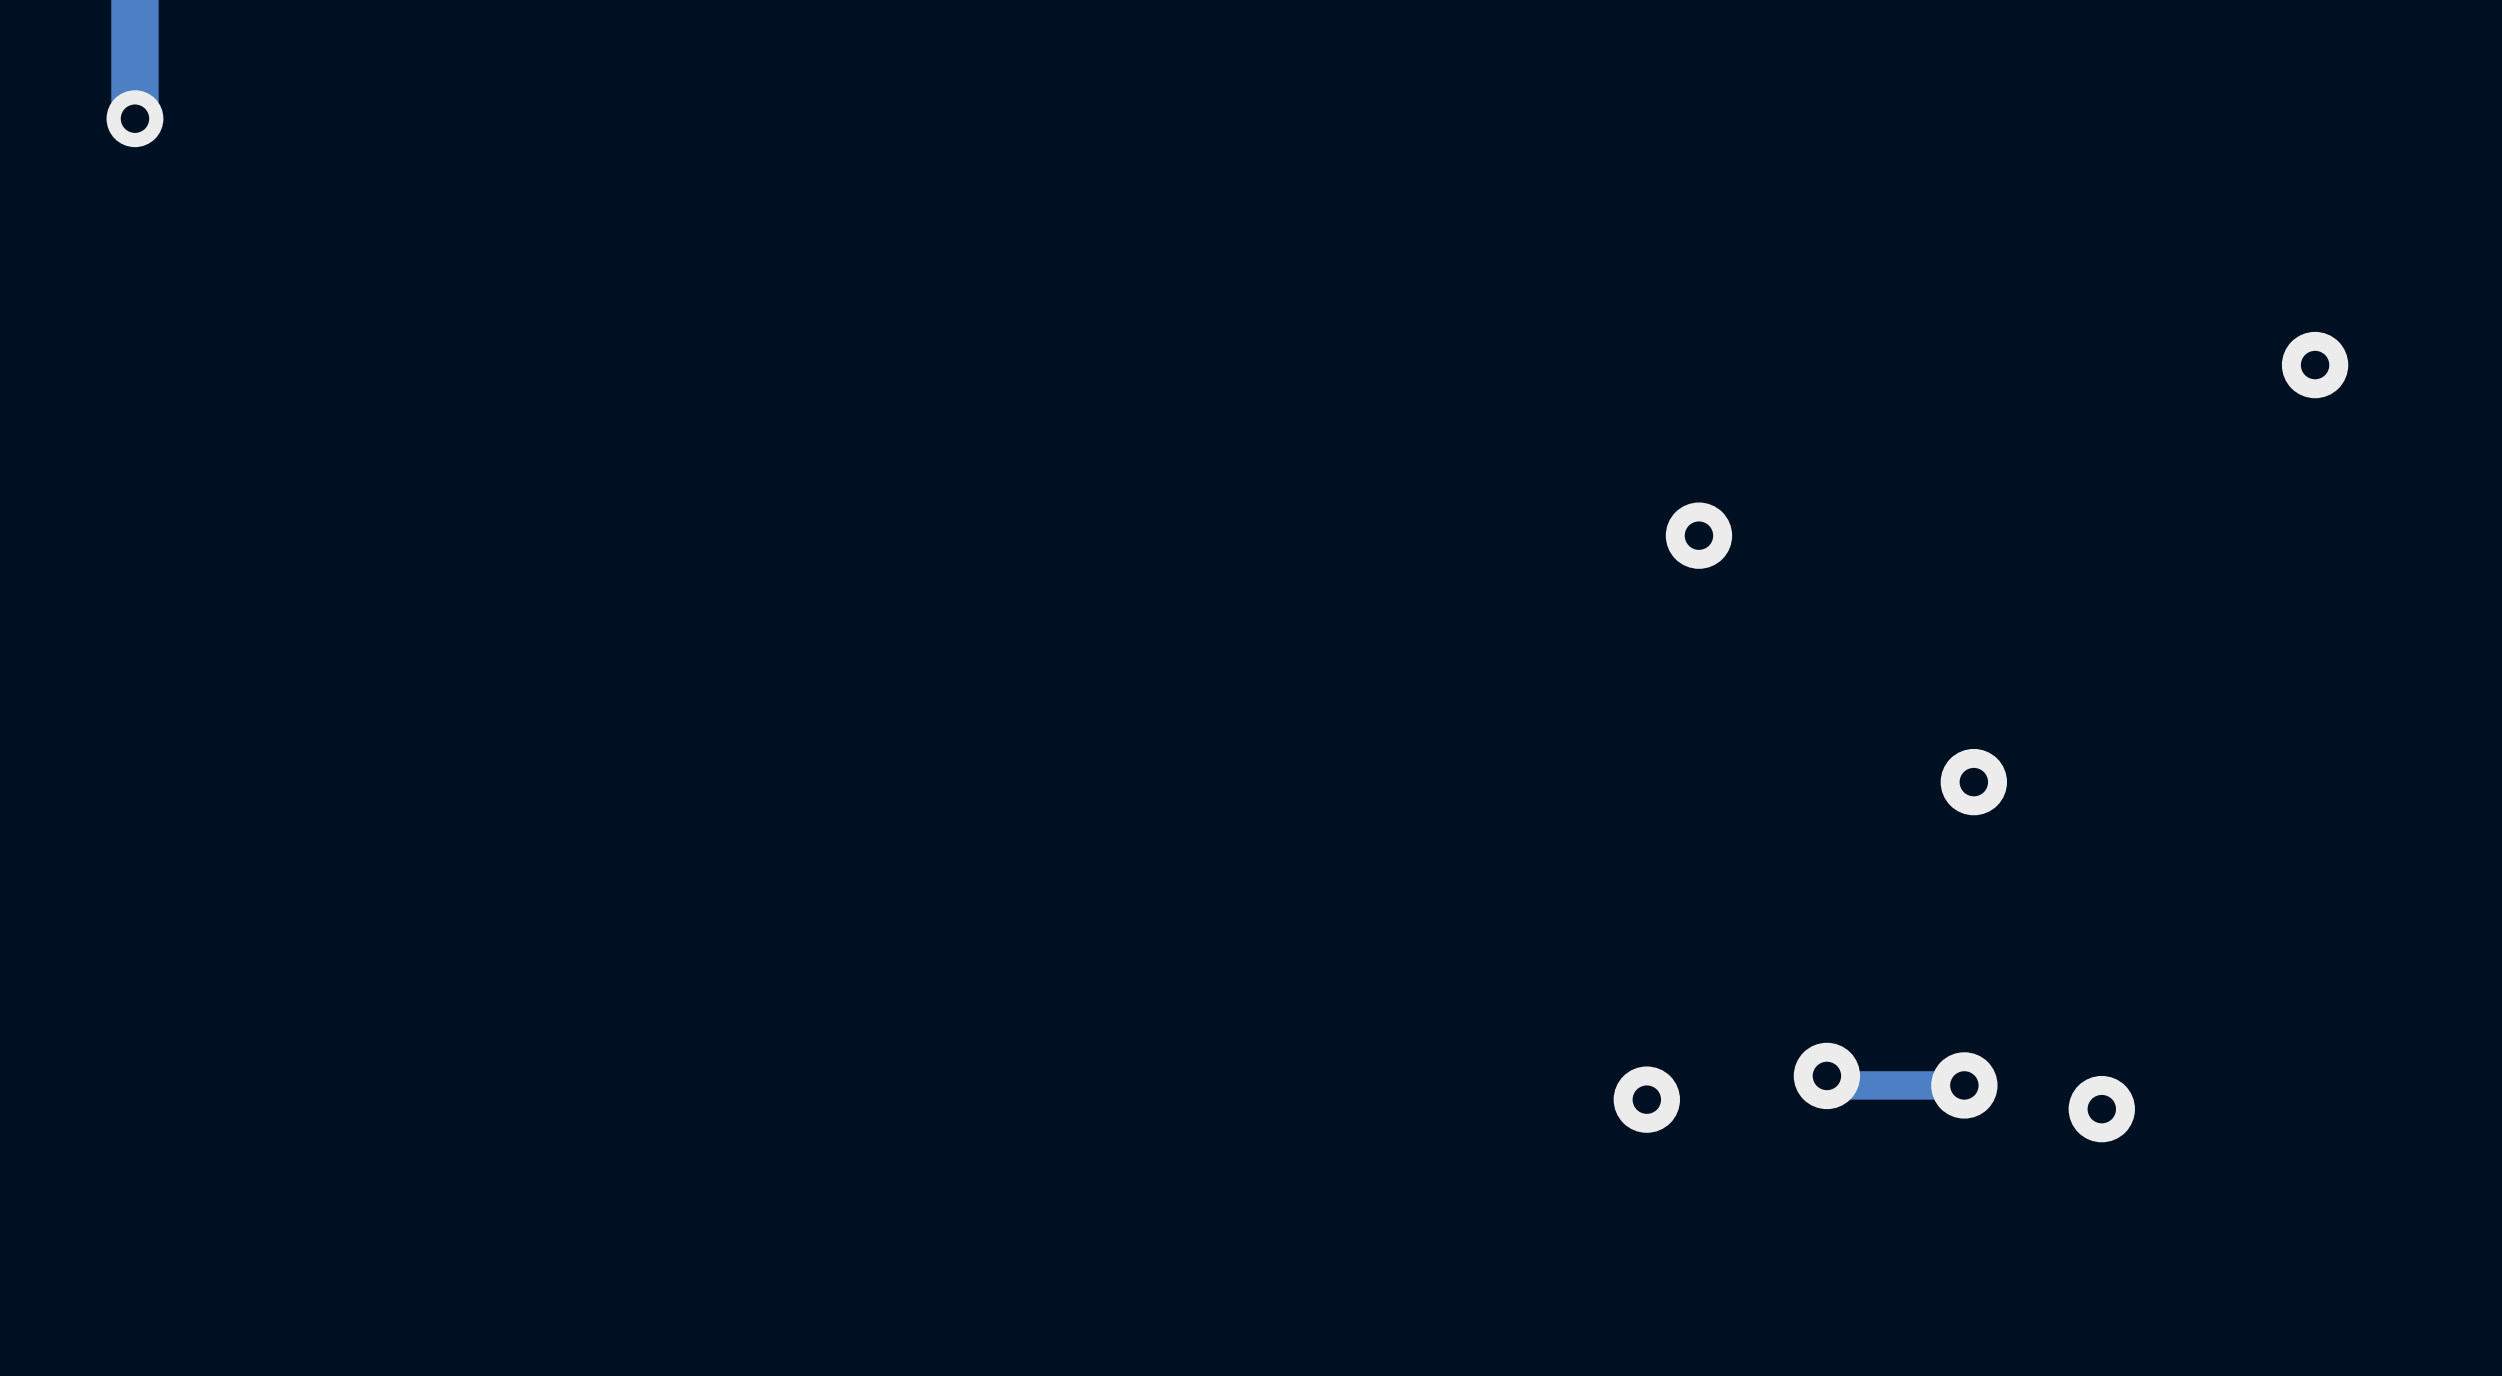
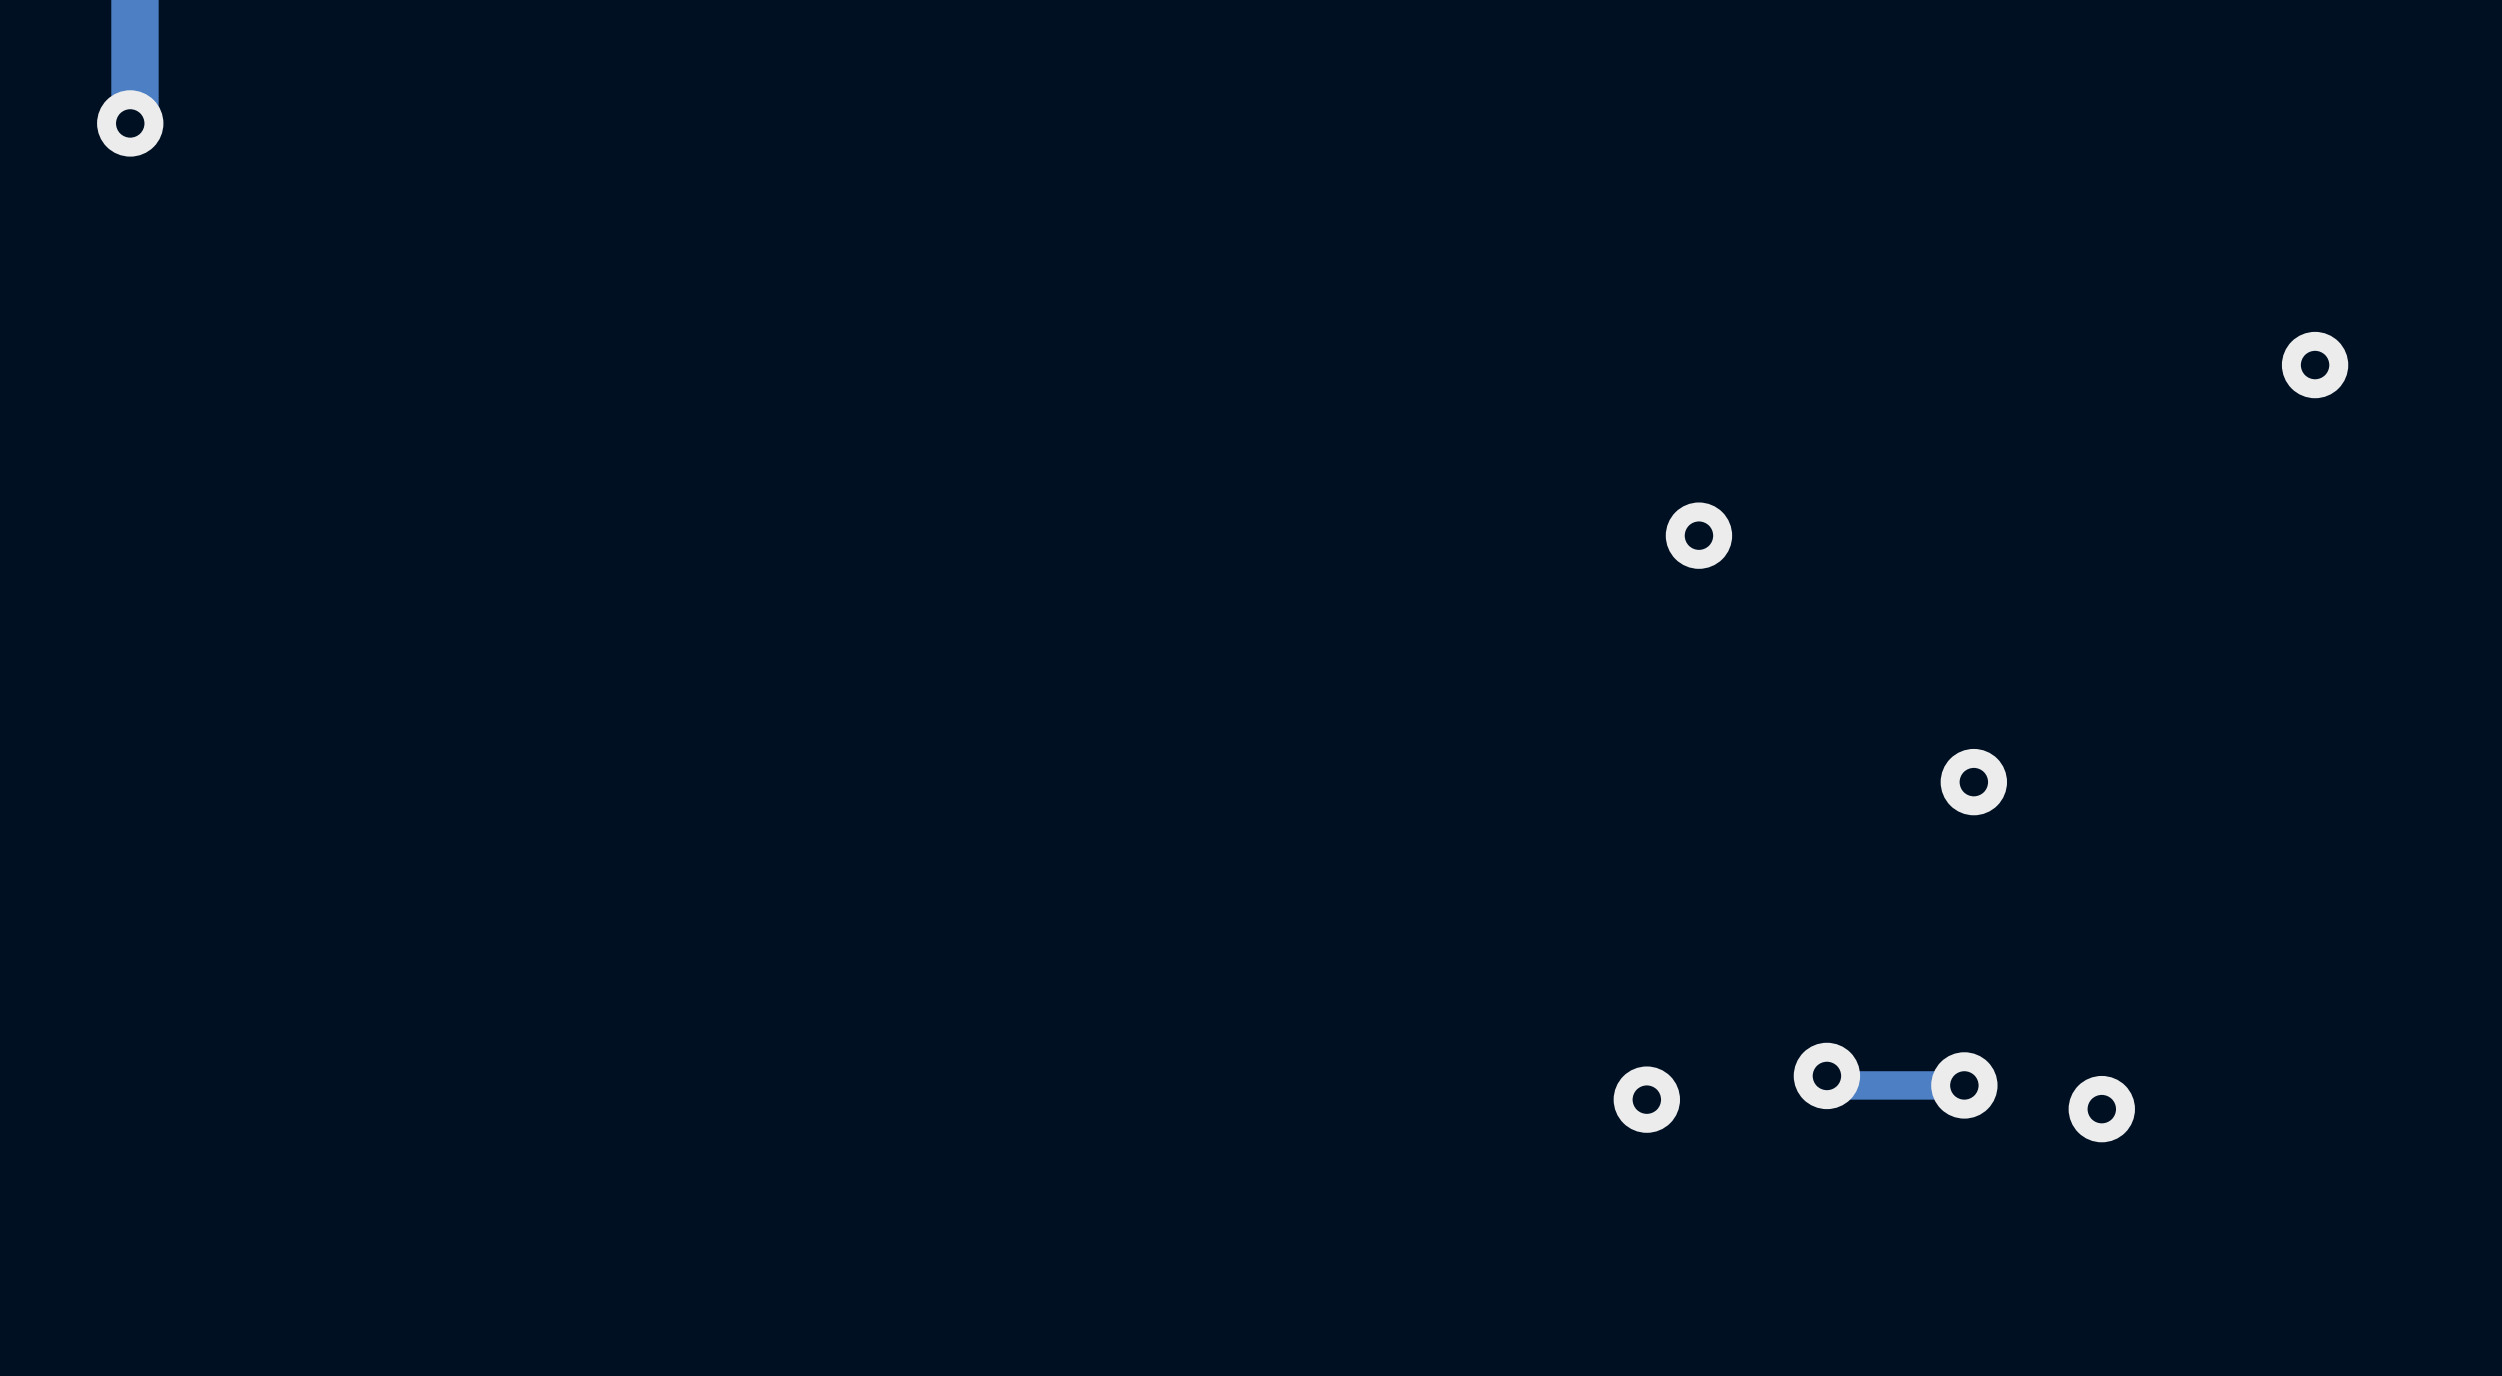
via size: [106, 90, 164, 148] -> [97, 90, 164, 157]

